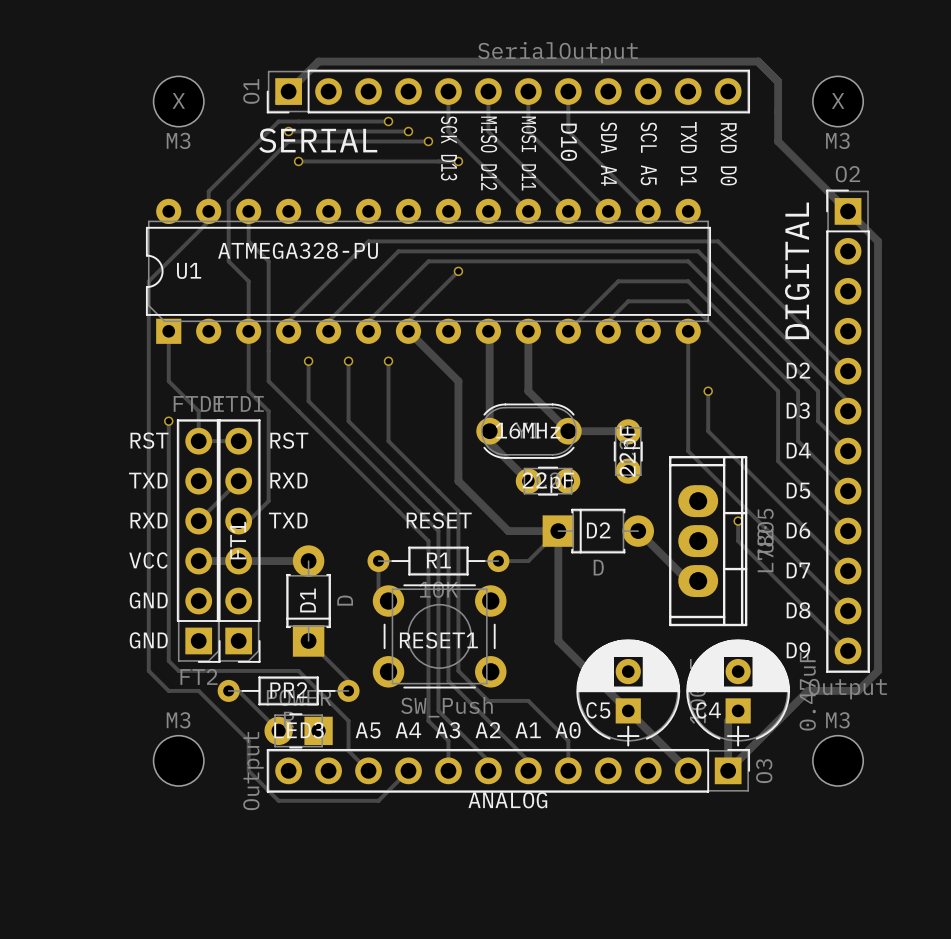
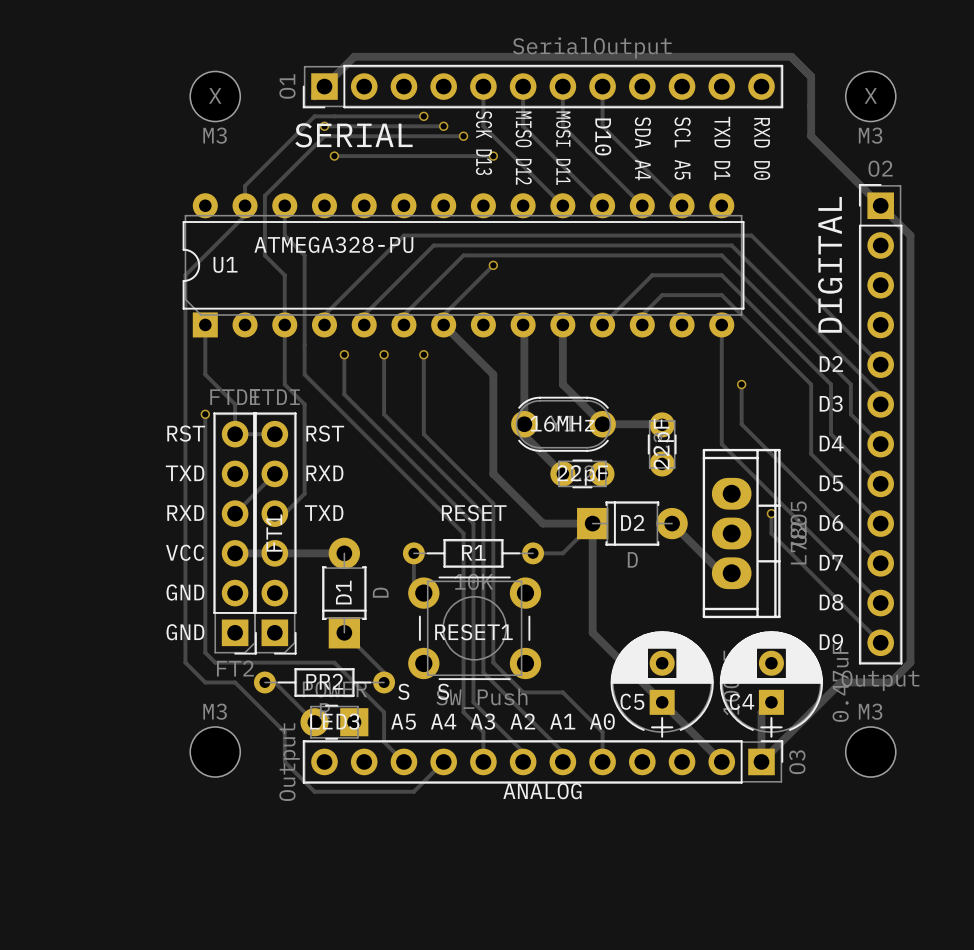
text: none -> S (403, 691)
text: none -> S (443, 691)

